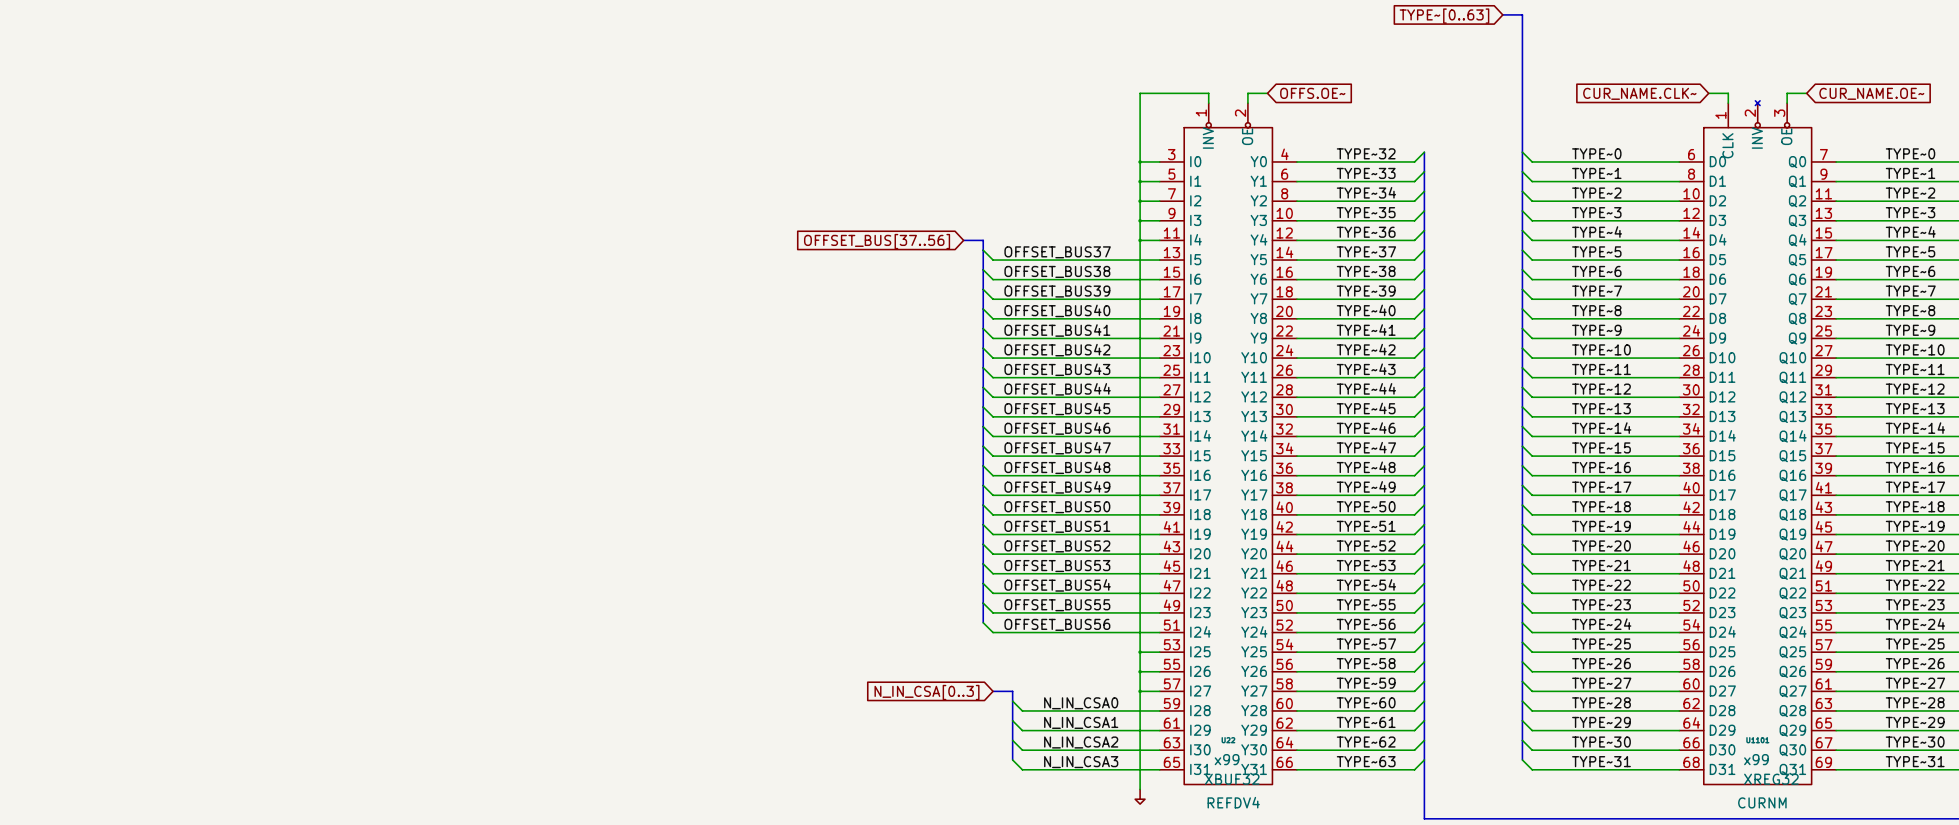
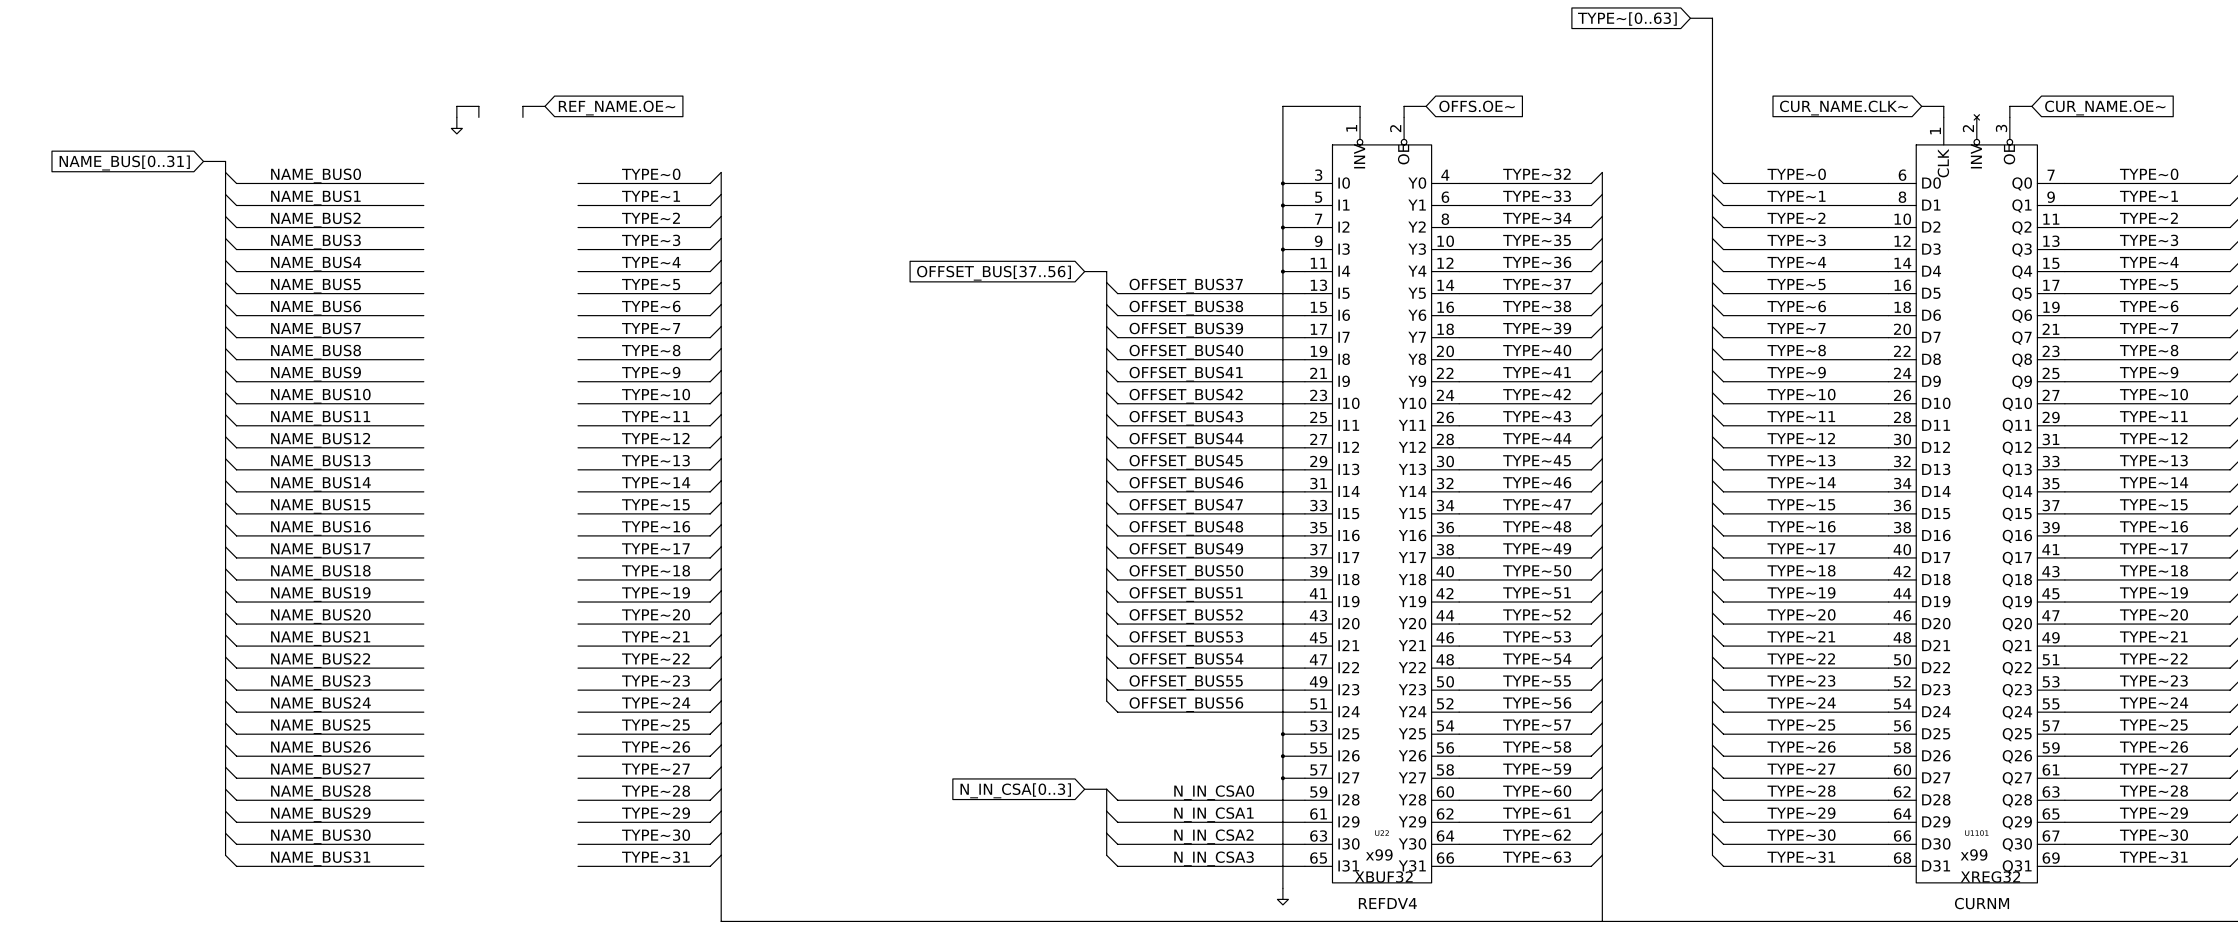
wire: none -> (544, 106) (522, 106) (522, 117)
global label: none -> REF_NAME.OE~ (617, 108)
wire: none -> (456, 117) (456, 106) (478, 106) (478, 117)
power symbol: none -> (456, 125)
bus: none -> (203, 161) (225, 161) (225, 855)
global label: none -> NAME_BUS[0..31] (124, 162)
wire: none -> (225, 172) (236, 183) (423, 183)
wire: none -> (721, 172) (710, 183) (578, 183)
bus: none -> (721, 172) (721, 921) (1602, 921)
label: none -> TYPE~0 (651, 174)
label: none -> NAME_BUS0 (316, 175)
wire: none -> (225, 194) (236, 205) (423, 205)
wire: none -> (721, 194) (710, 205) (578, 205)
label: none -> NAME_BUS1 (315, 198)
label: none -> TYPE~1 (651, 196)
wire: none -> (225, 216) (236, 227) (423, 227)
wire: none -> (721, 216) (710, 227) (578, 227)
label: none -> NAME_BUS2 (315, 220)
label: none -> TYPE~2 (650, 218)
wire: none -> (225, 238) (236, 249) (423, 249)
wire: none -> (721, 238) (710, 249) (578, 249)
label: none -> TYPE~3 (651, 240)
label: none -> NAME_BUS3 (315, 242)
wire: none -> (225, 260) (236, 271) (423, 271)
wire: none -> (721, 260) (710, 271) (578, 271)
label: none -> NAME_BUS4 (316, 264)
label: none -> TYPE~4 (651, 262)
wire: none -> (225, 282) (236, 293) (423, 293)
wire: none -> (721, 282) (710, 293) (578, 293)
label: none -> TYPE~5 (651, 284)
label: none -> NAME_BUS5 (315, 286)
wire: none -> (225, 304) (236, 315) (423, 315)
wire: none -> (721, 304) (710, 315) (578, 315)
label: none -> NAME_BUS6 (316, 308)
label: none -> TYPE~6 (651, 306)
wire: none -> (225, 326) (236, 337) (423, 337)
wire: none -> (721, 326) (710, 337) (578, 337)
label: none -> NAME_BUS7 (315, 330)
label: none -> TYPE~7 (651, 328)
wire: none -> (225, 348) (236, 359) (423, 359)
wire: none -> (721, 348) (710, 359) (578, 359)
label: none -> TYPE~8 (651, 350)
label: none -> NAME_BUS8 (316, 352)
wire: none -> (225, 370) (236, 381) (423, 381)
wire: none -> (721, 370) (710, 381) (578, 381)
label: none -> NAME_BUS9 (316, 374)
label: none -> TYPE~9 (651, 372)
wire: none -> (225, 392) (236, 403) (423, 403)
wire: none -> (721, 392) (710, 403) (578, 403)
label: none -> TYPE~10 (656, 394)
label: none -> NAME_BUS10 (320, 396)
wire: none -> (225, 414) (236, 425) (423, 425)
wire: none -> (721, 414) (710, 425) (578, 425)
label: none -> NAME_BUS11 (320, 418)
label: none -> TYPE~11 (655, 416)
wire: none -> (225, 436) (236, 447) (423, 447)
wire: none -> (721, 436) (710, 447) (578, 447)
label: none -> NAME_BUS12 (320, 440)
label: none -> TYPE~12 (655, 438)
wire: none -> (225, 458) (236, 469) (423, 469)
wire: none -> (721, 458) (710, 469) (578, 469)
label: none -> TYPE~13 (655, 460)
label: none -> NAME_BUS13 (320, 462)
wire: none -> (225, 480) (236, 491) (423, 491)
wire: none -> (721, 480) (710, 491) (578, 491)
label: none -> NAME_BUS14 (320, 484)
label: none -> TYPE~14 (656, 482)
wire: none -> (225, 502) (236, 513) (423, 513)
wire: none -> (721, 502) (710, 513) (578, 513)
label: none -> TYPE~15 (655, 504)
label: none -> NAME_BUS15 (320, 506)
wire: none -> (225, 524) (236, 535) (423, 535)
wire: none -> (721, 524) (710, 535) (578, 535)
label: none -> TYPE~16 (656, 526)
label: none -> NAME_BUS16 (320, 528)
wire: none -> (225, 546) (236, 557) (423, 557)
wire: none -> (721, 546) (710, 557) (578, 557)
label: none -> NAME_BUS17 (320, 550)
label: none -> TYPE~17 (655, 548)
wire: none -> (225, 568) (236, 579) (423, 579)
wire: none -> (721, 568) (710, 579) (578, 579)
label: none -> TYPE~18 (656, 570)
label: none -> NAME_BUS18 (320, 572)
wire: none -> (225, 590) (236, 602) (423, 602)
wire: none -> (721, 590) (710, 602) (578, 602)
label: none -> NAME_BUS19 (320, 594)
label: none -> TYPE~19 (656, 592)
wire: none -> (225, 613) (236, 624) (423, 624)
wire: none -> (721, 613) (710, 624) (578, 624)
label: none -> TYPE~20 (656, 614)
label: none -> NAME_BUS20 (320, 616)
wire: none -> (225, 635) (236, 646) (423, 646)
wire: none -> (721, 635) (710, 646) (578, 646)
label: none -> TYPE~21 (655, 636)
label: none -> NAME_BUS21 (320, 638)
wire: none -> (225, 657) (236, 668) (423, 668)
wire: none -> (721, 657) (710, 668) (578, 668)
label: none -> NAME_BUS22 (320, 660)
label: none -> TYPE~22 (655, 658)
wire: none -> (225, 679) (236, 690) (423, 690)
wire: none -> (721, 679) (710, 690) (578, 690)
label: none -> TYPE~23 (655, 680)
label: none -> NAME_BUS23 (320, 682)
wire: none -> (225, 701) (236, 712) (423, 712)
wire: none -> (721, 701) (710, 712) (578, 712)
label: none -> NAME_BUS24 (320, 704)
label: none -> TYPE~24 (656, 702)
wire: none -> (225, 723) (236, 734) (423, 734)
wire: none -> (721, 723) (710, 734) (578, 734)
label: none -> NAME_BUS25 (320, 726)
label: none -> TYPE~25 (655, 725)
wire: none -> (225, 745) (236, 756) (423, 756)
wire: none -> (721, 745) (710, 756) (578, 756)
label: none -> TYPE~26 (656, 747)
label: none -> NAME_BUS26 (320, 748)
wire: none -> (225, 767) (236, 778) (423, 778)
wire: none -> (721, 767) (710, 778) (578, 778)
label: none -> NAME_BUS27 (320, 770)
label: none -> TYPE~27 (655, 768)
bus: (993, 691) (1012, 691) (1012, 760) -> none
global label position: N_IN_CSA[0..3] (927, 692) -> N_IN_CSA[0..3] (1015, 790)
wire: none -> (225, 789) (236, 800) (423, 800)
wire: none -> (721, 789) (710, 800) (578, 800)
bus: none -> (1084, 789) (1106, 789) (1106, 855)
wire: (1012, 701) (1022, 710) -> (1106, 789) (1117, 800) (1150, 800)
label: none -> TYPE~28 (656, 791)
label: none -> NAME_BUS28 (320, 792)
wire: none -> (225, 811) (236, 822) (423, 822)
wire: none -> (721, 811) (710, 822) (578, 822)
wire: (1012, 720) (1022, 730) -> (1106, 811) (1117, 822) (1150, 822)
label: none -> NAME_BUS29 (320, 814)
label: none -> TYPE~29 (656, 813)
wire: none -> (225, 833) (236, 844) (423, 844)
wire: none -> (721, 833) (710, 844) (578, 844)
wire: (1012, 740) (1022, 750) -> (1106, 833) (1117, 844) (1150, 844)
label: none -> NAME_BUS30 (320, 836)
label: none -> TYPE~30 (656, 835)
wire: none -> (225, 855) (236, 866) (423, 866)
wire: none -> (721, 855) (710, 866) (578, 866)
wire: (1012, 760) (1022, 769) -> (1106, 855) (1117, 866) (1150, 866)
label: none -> TYPE~31 (655, 857)
label: none -> NAME_BUS31 (320, 858)

